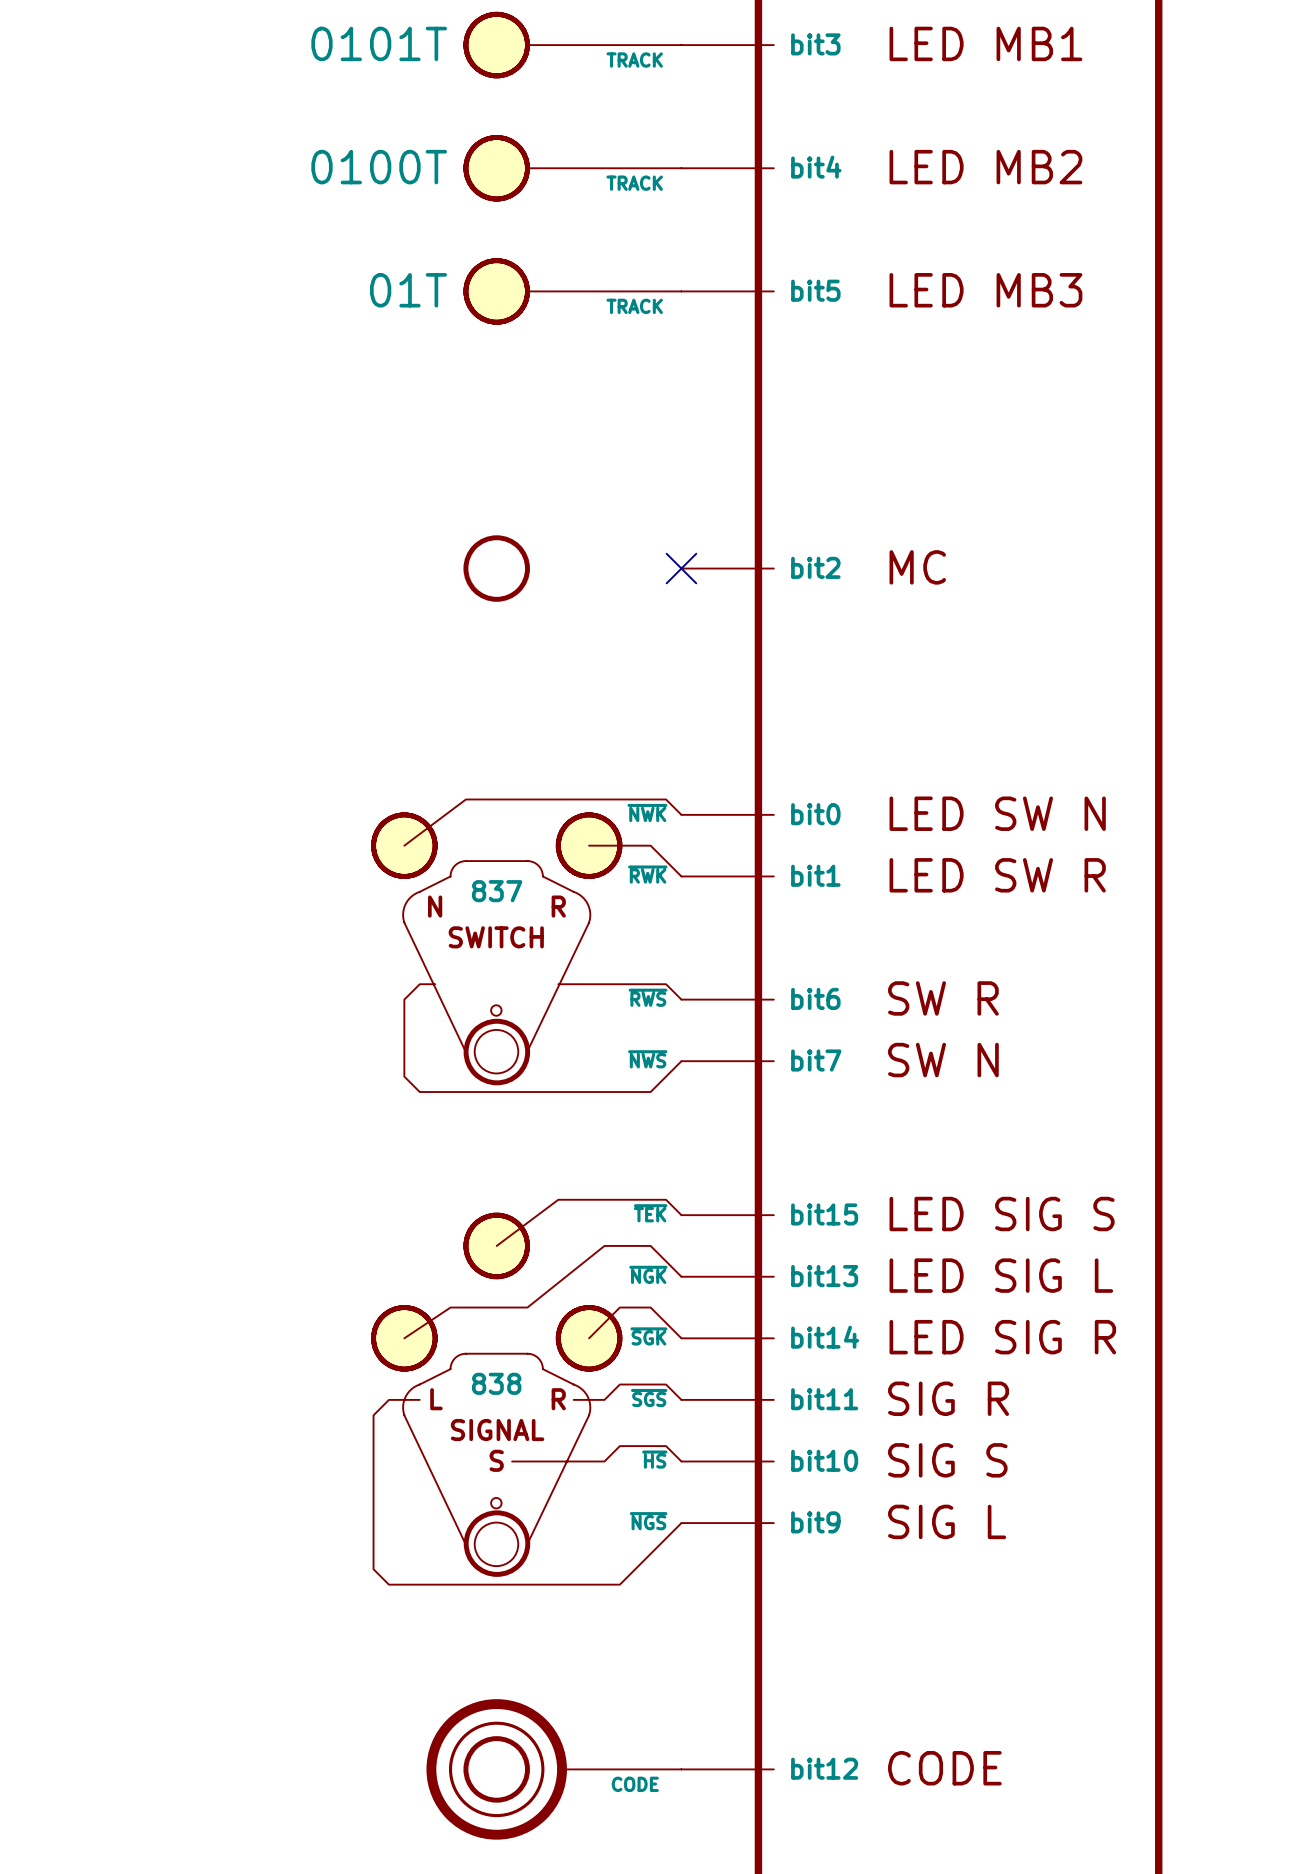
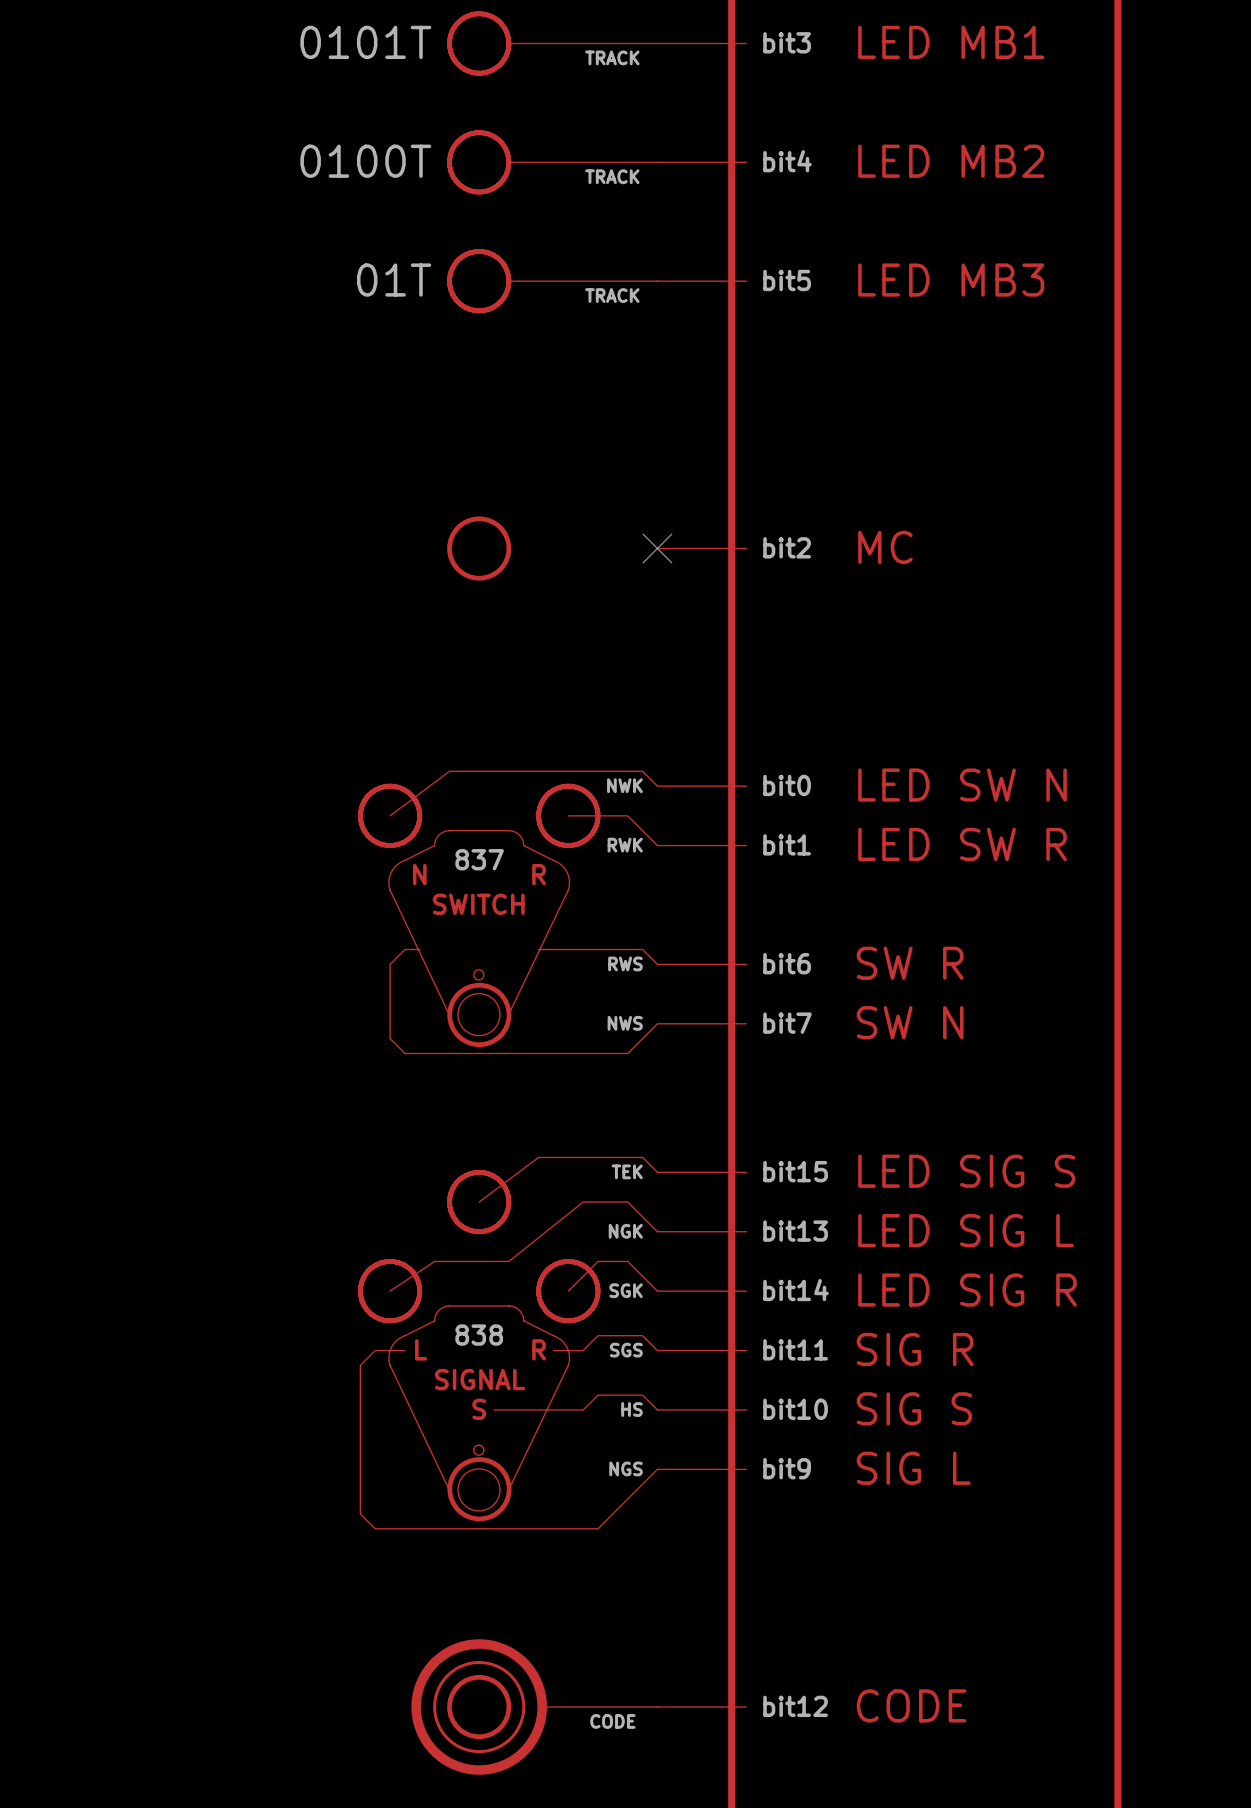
part pin name: ~{NWK} (647, 813) -> NWK (624, 785)
part pin name: ~{RWK} (647, 874) -> RWK (625, 845)
part pin name: ~{RWS} (648, 997) -> RWS (625, 963)
part pin name: ~{NWS} (647, 1059) -> NWS (625, 1023)
part pin name: ~{TEK} (650, 1213) -> TEK (627, 1171)
part pin name: ~{NGK} (648, 1274) -> NGK (625, 1231)
part pin name: ~{SGK} (648, 1336) -> SGK (626, 1290)
part pin name: ~{SGS} (649, 1398) -> SGS (626, 1350)
part pin name: ~{HS} (654, 1459) -> HS (631, 1409)
part pin name: ~{NGS} (648, 1521) -> NGS (626, 1468)

